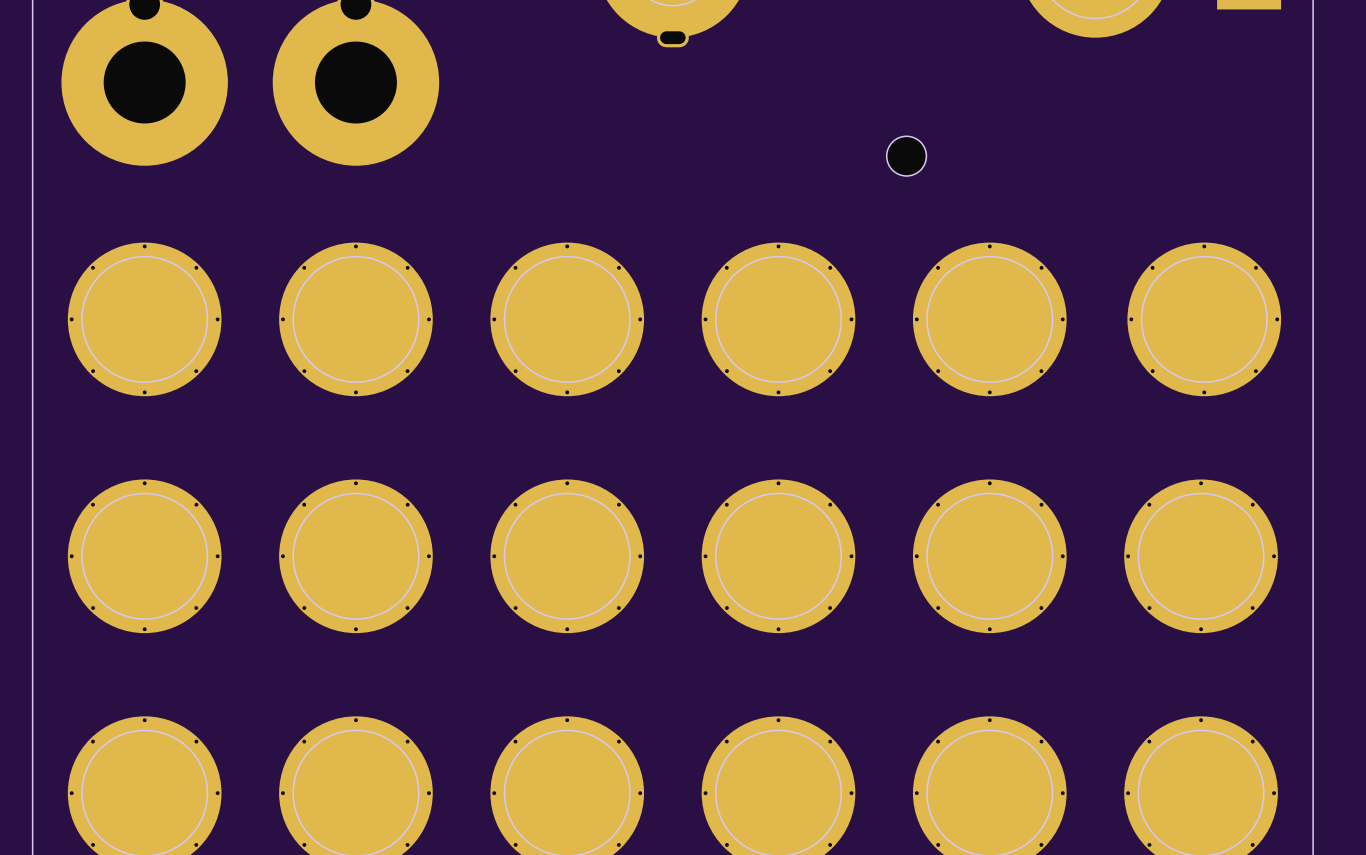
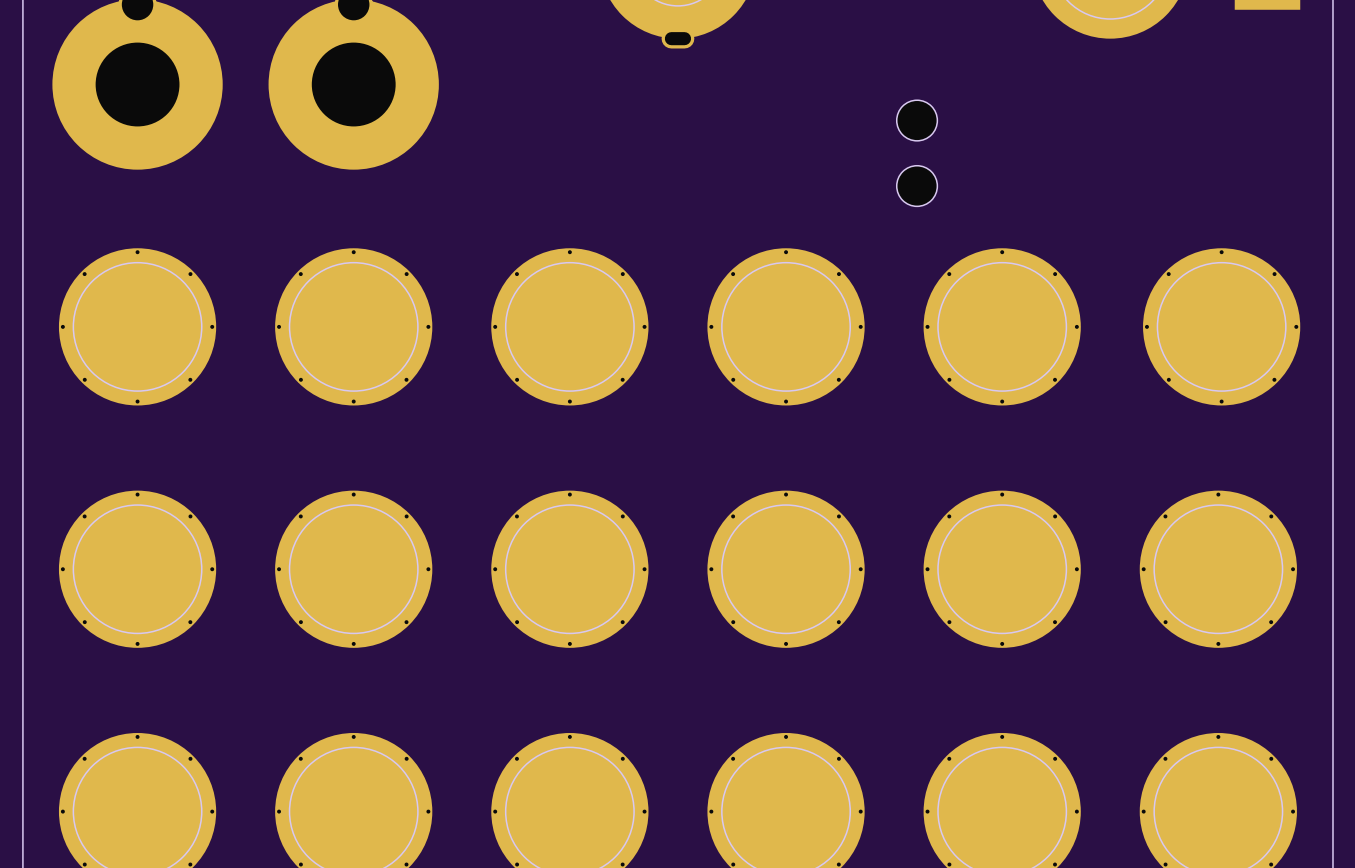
part: none -> (917, 120)
part: (906, 156) -> none
part: none -> (917, 186)

